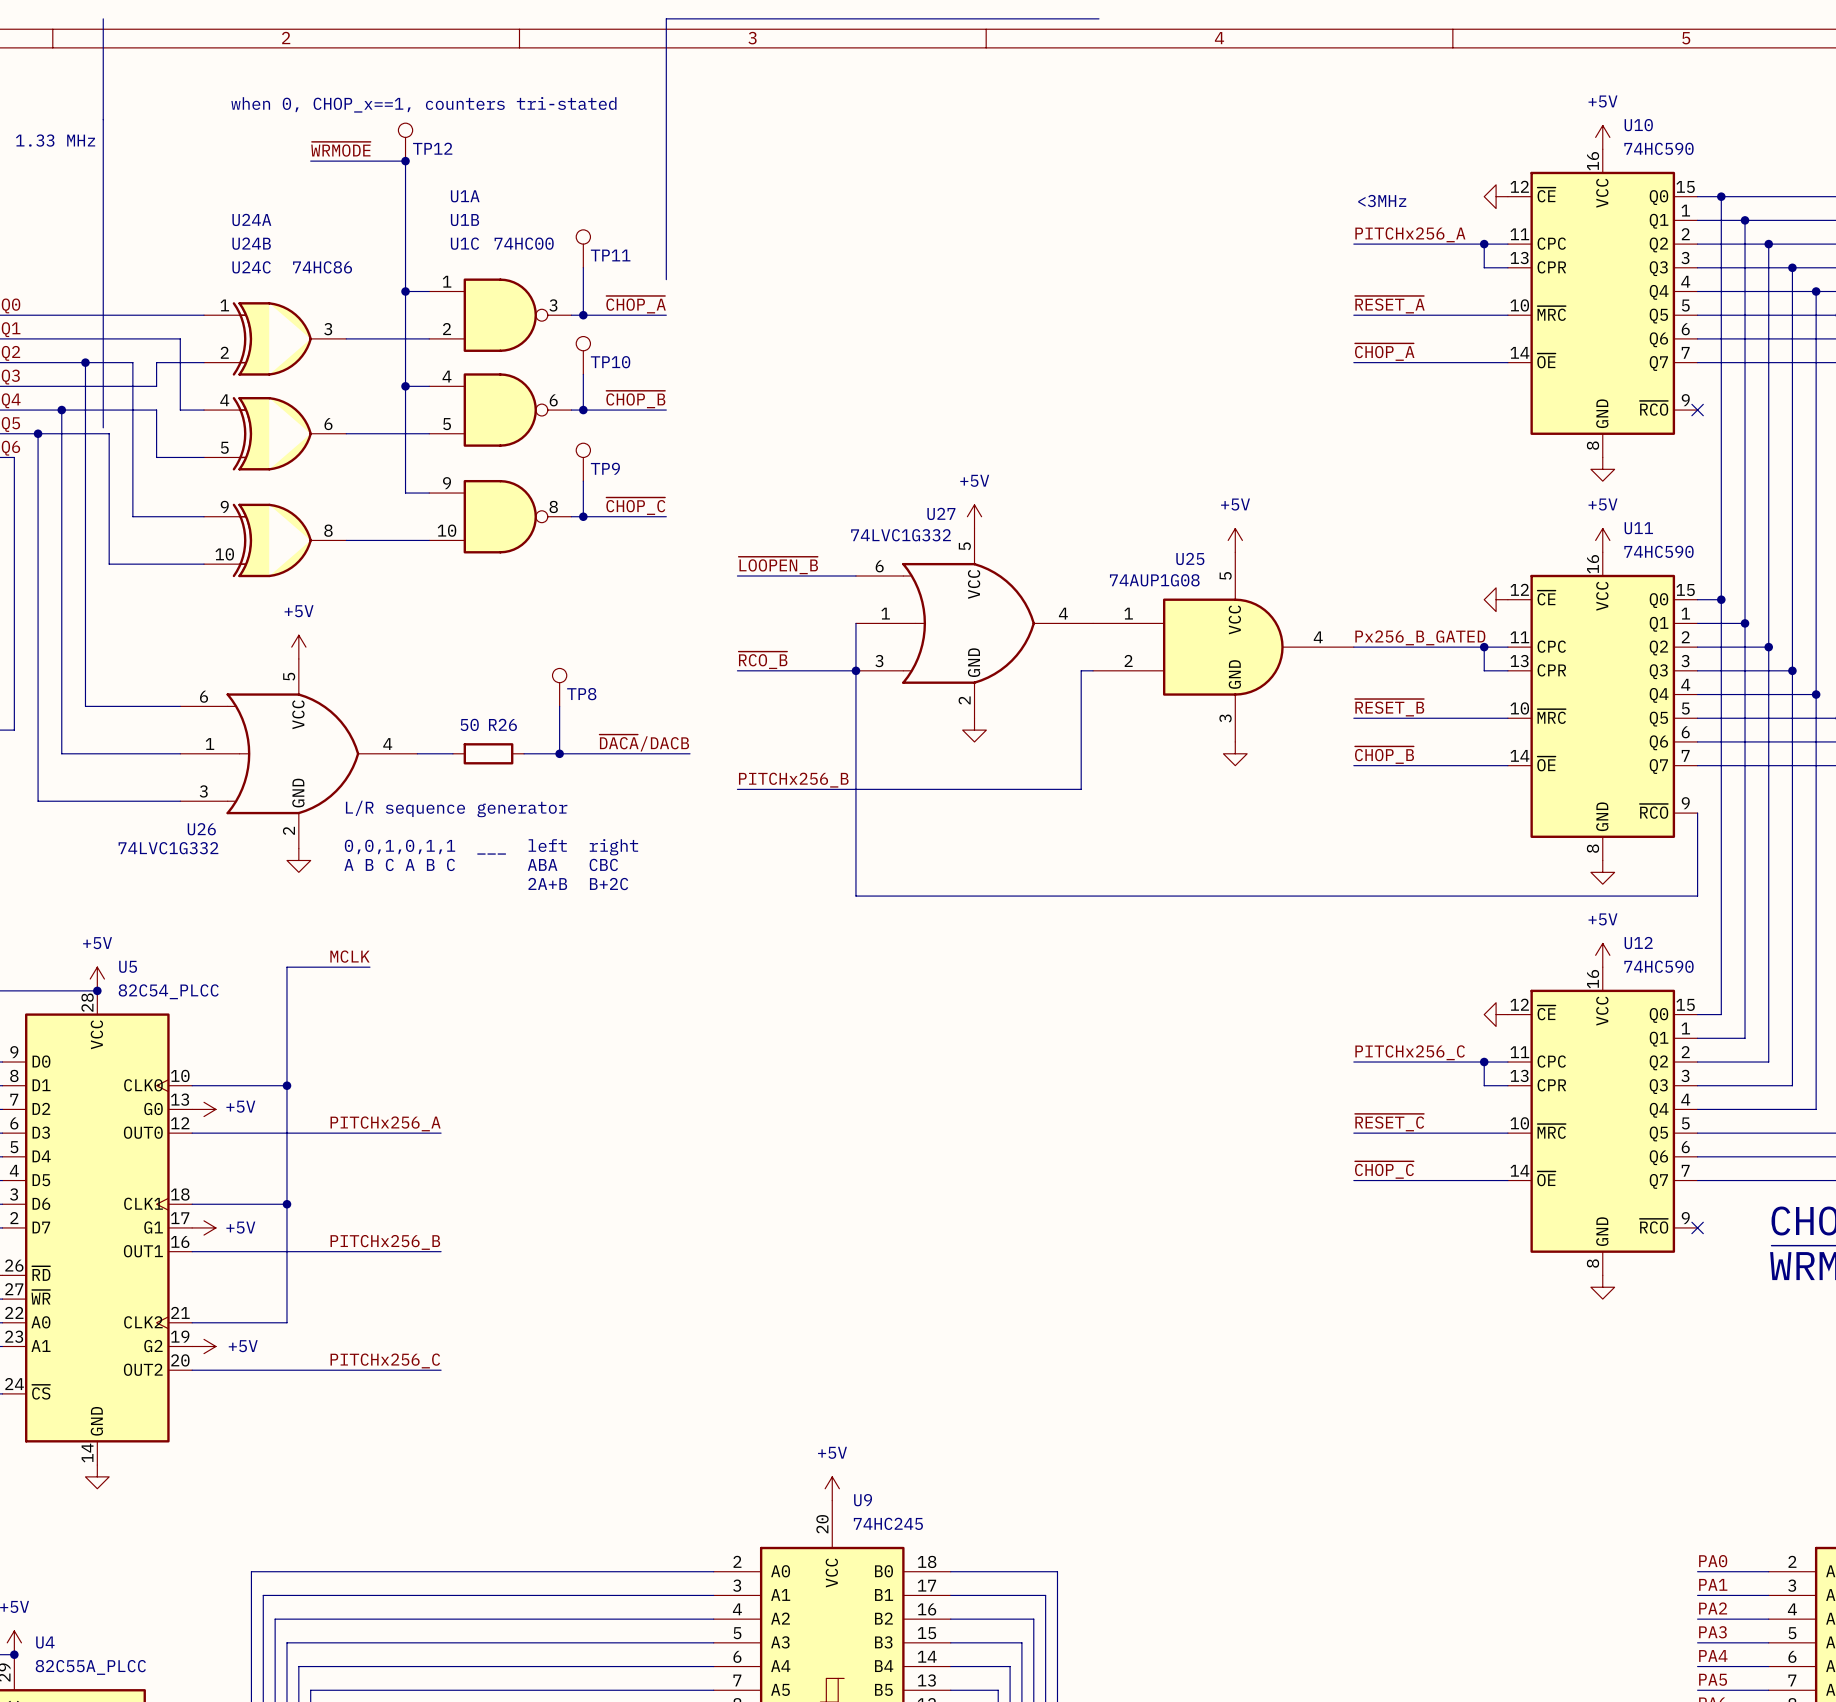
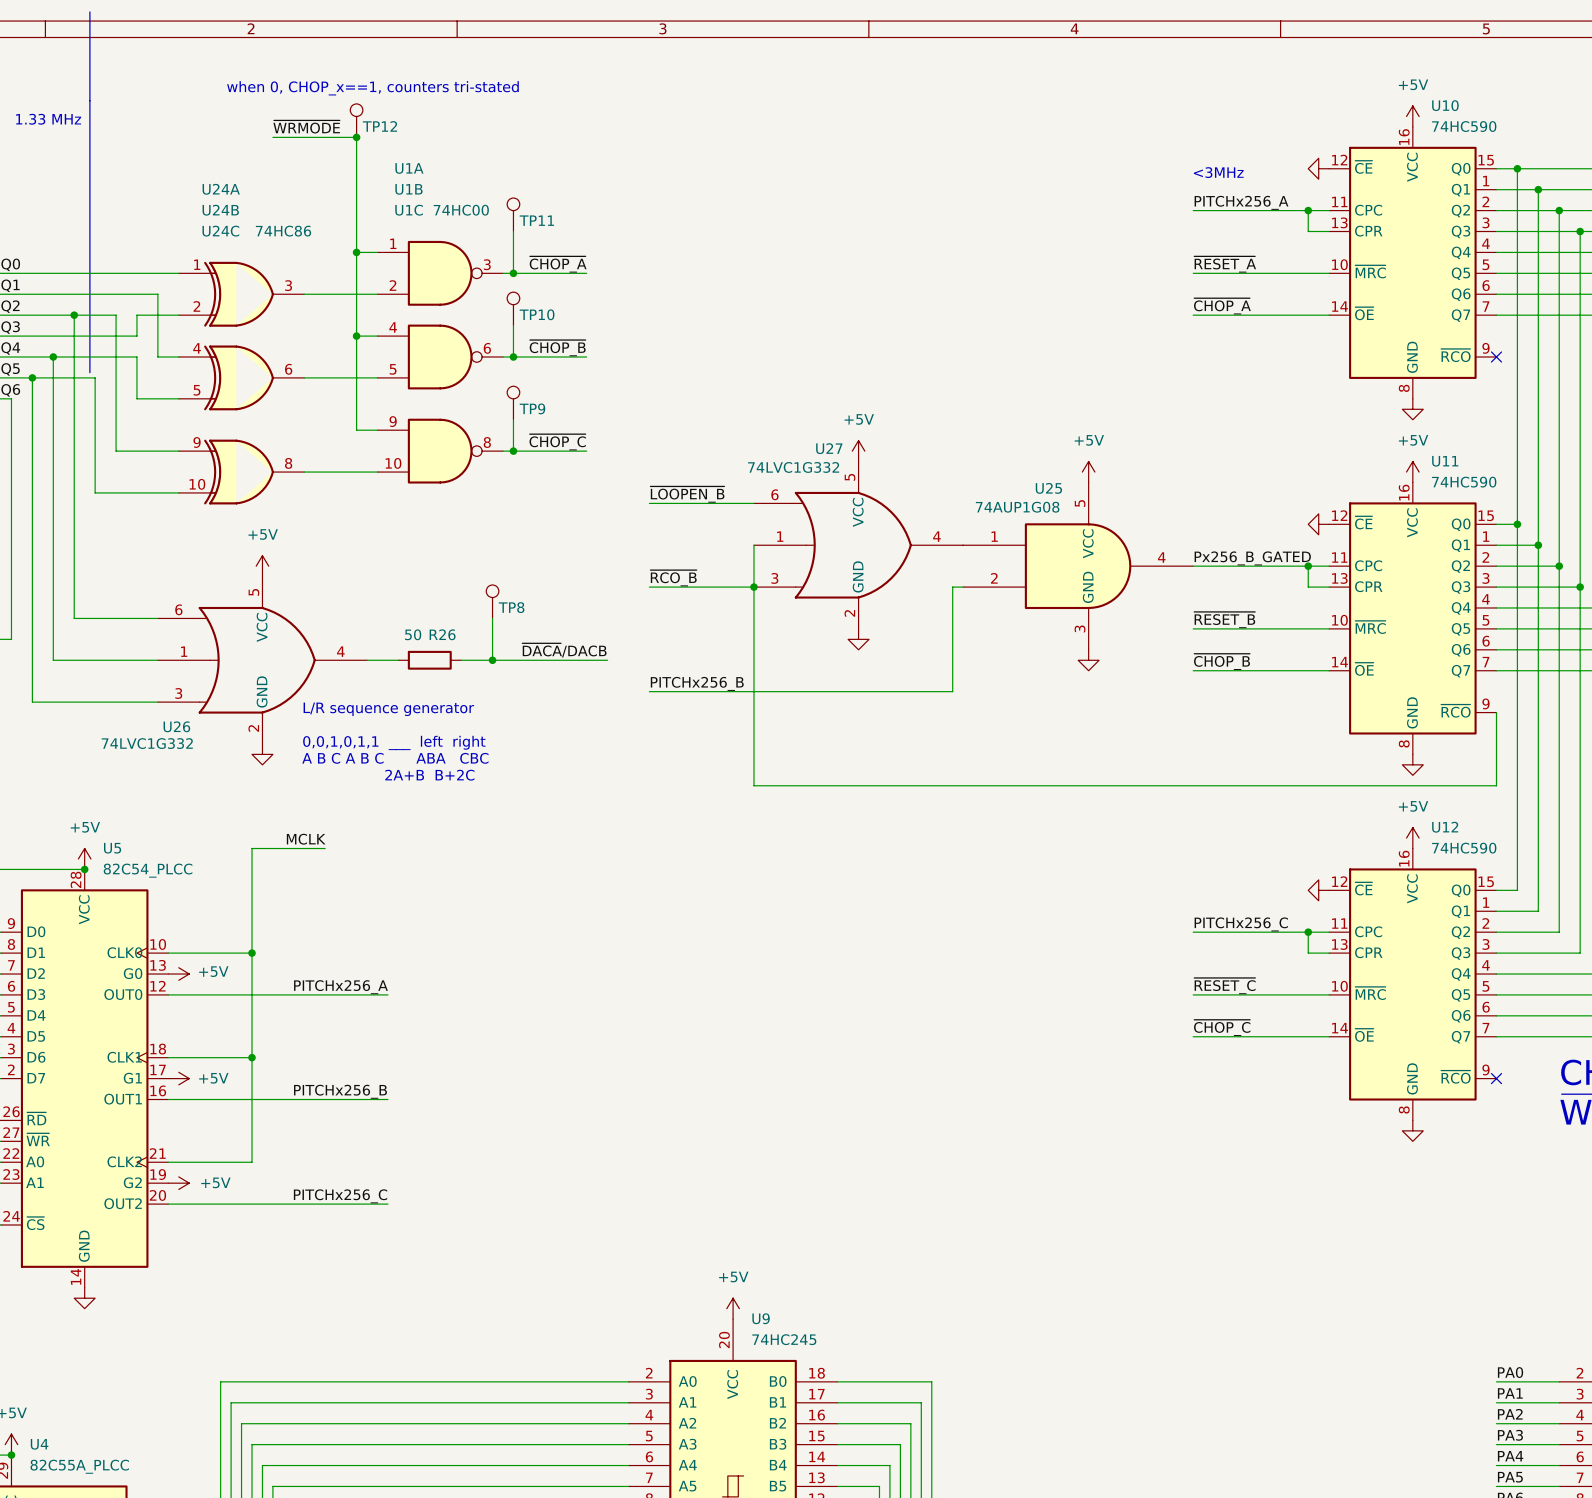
line: (1098, 18) (666, 18) (666, 279) -> none

